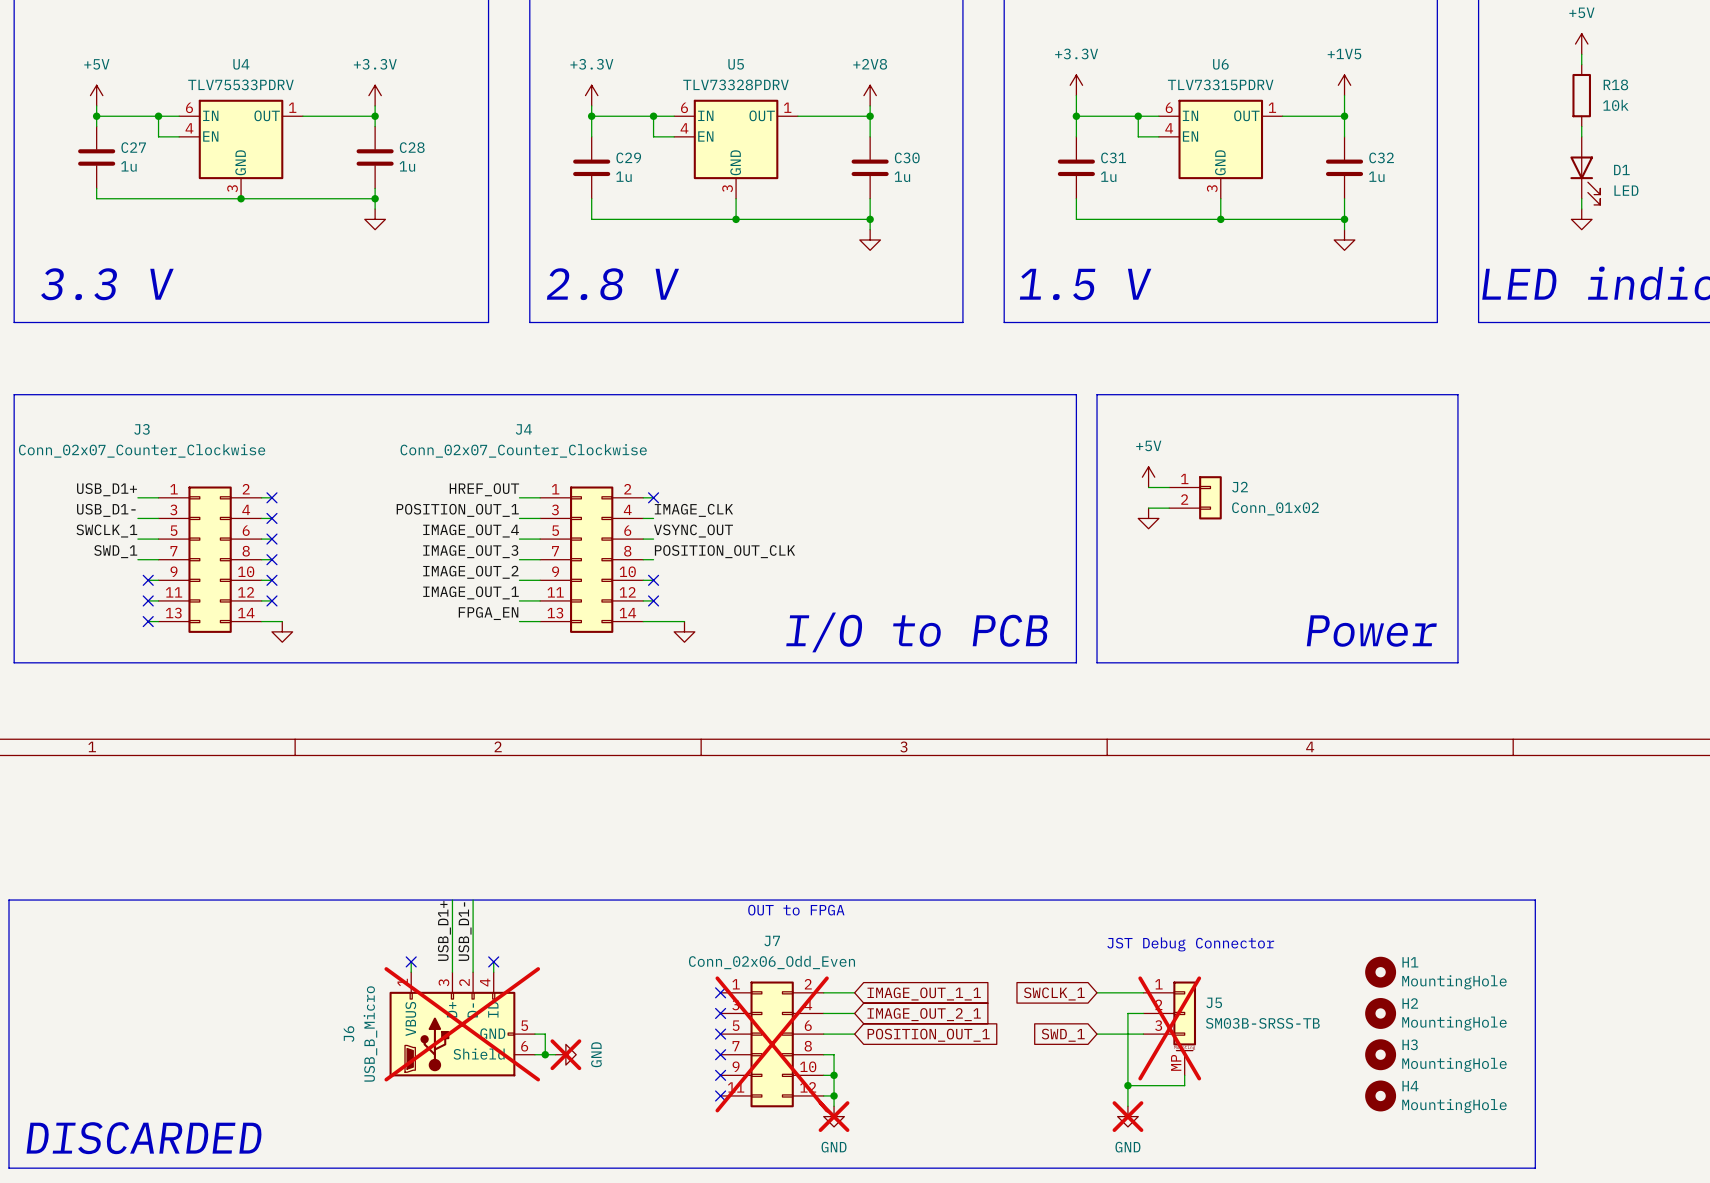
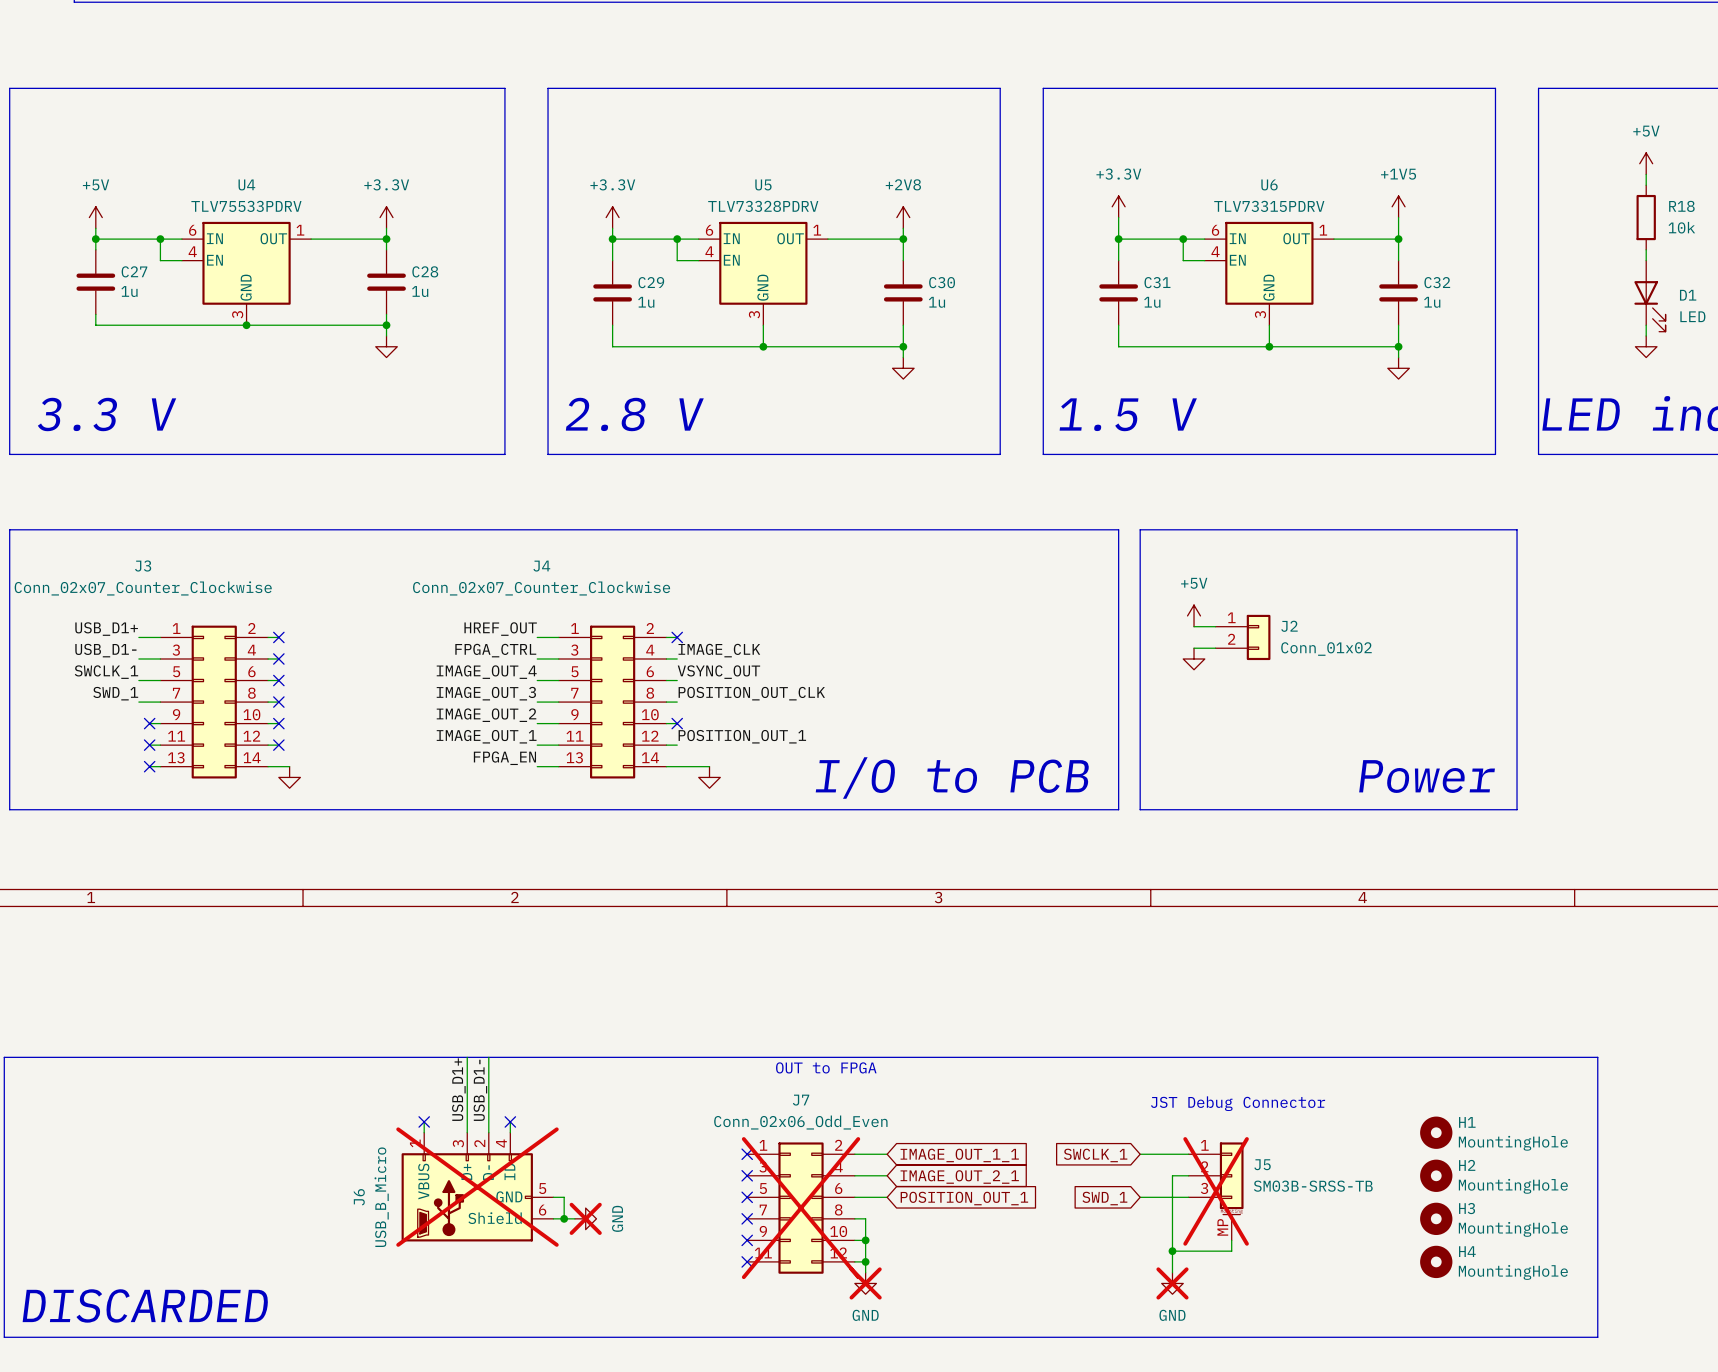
label: POSITION_OUT_1 (457, 510) -> FPGA_CTRL (495, 650)
label: none -> POSITION_OUT_1 (742, 736)
no-connect mark: (653, 600) -> none

